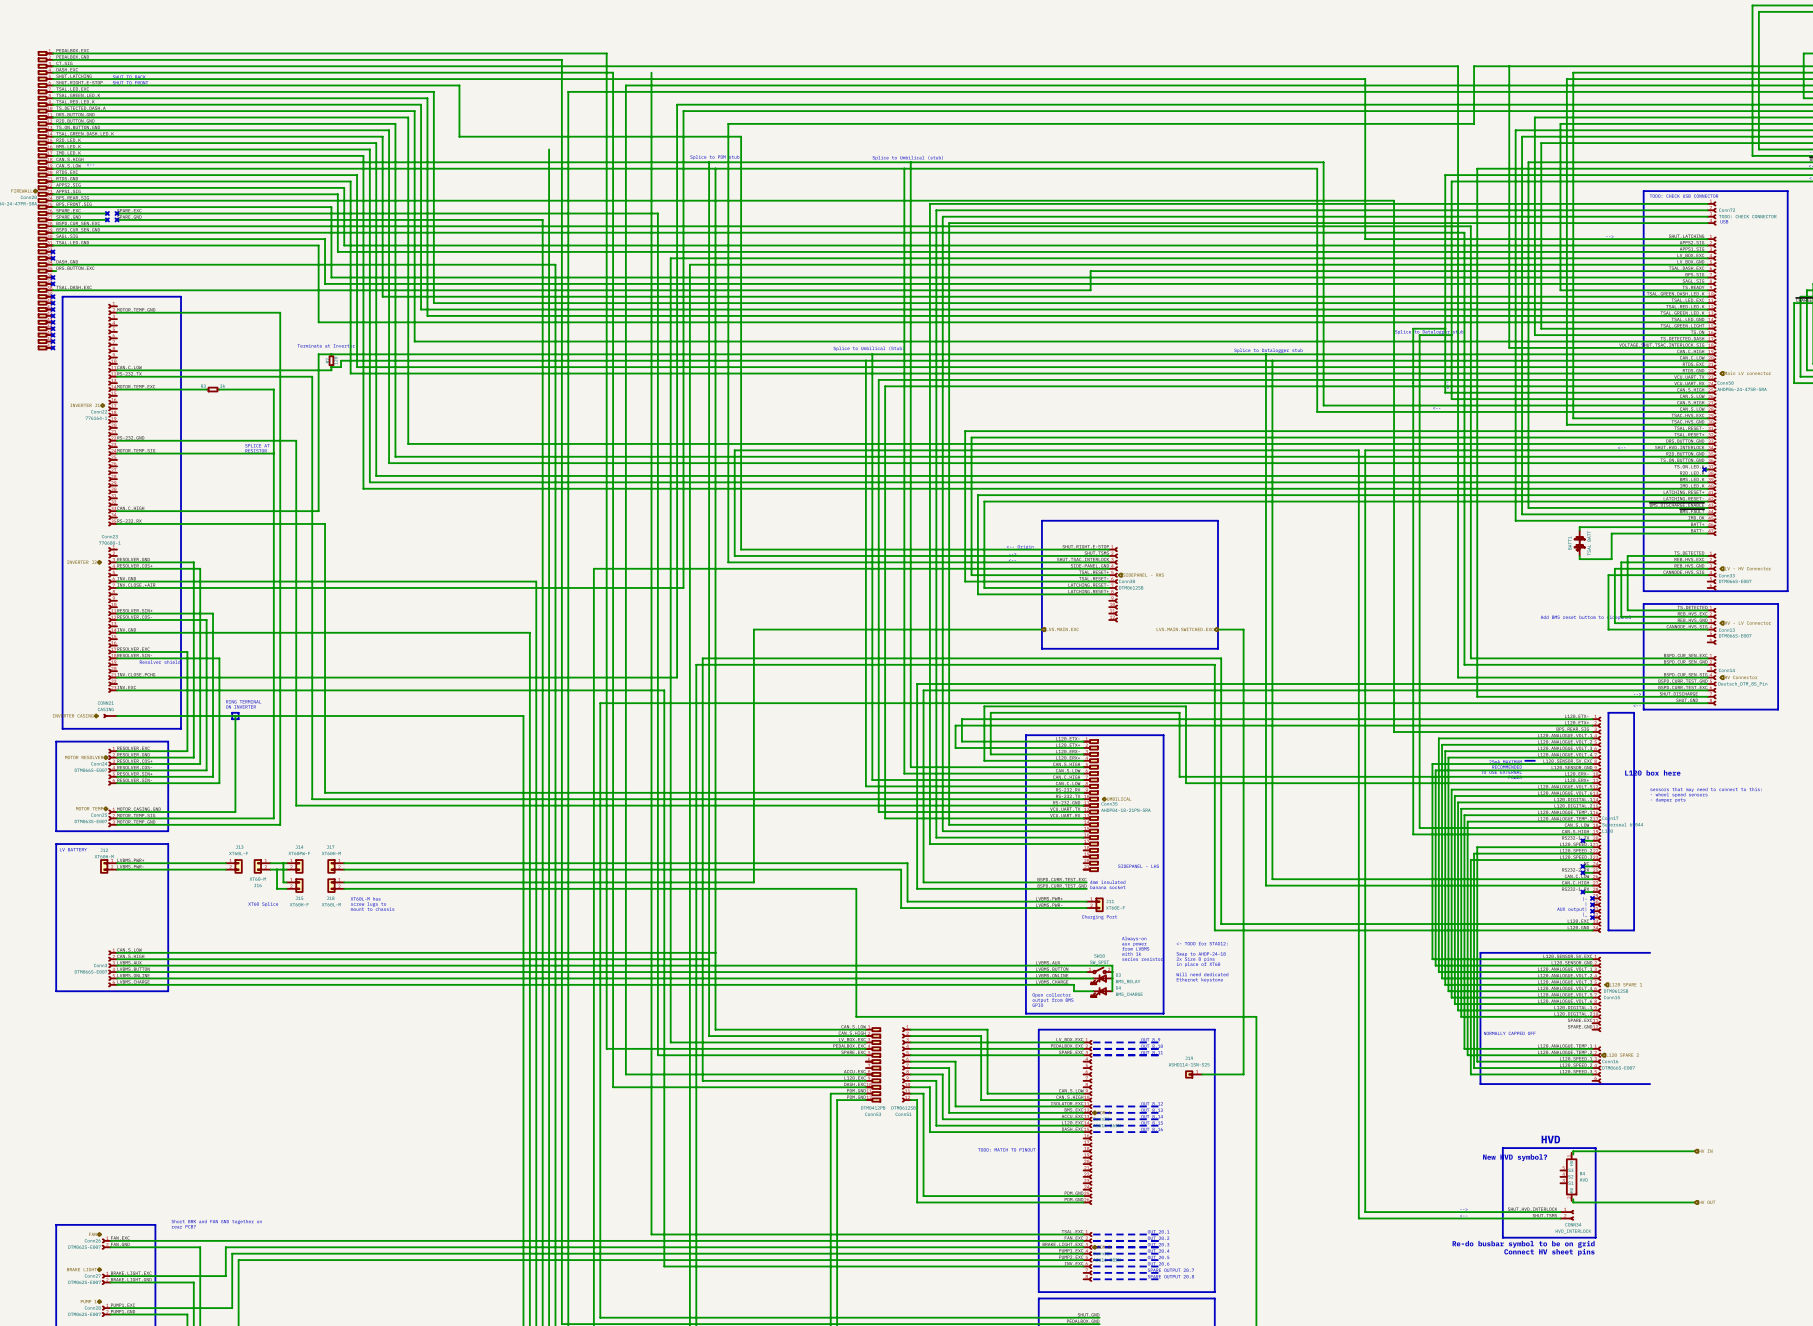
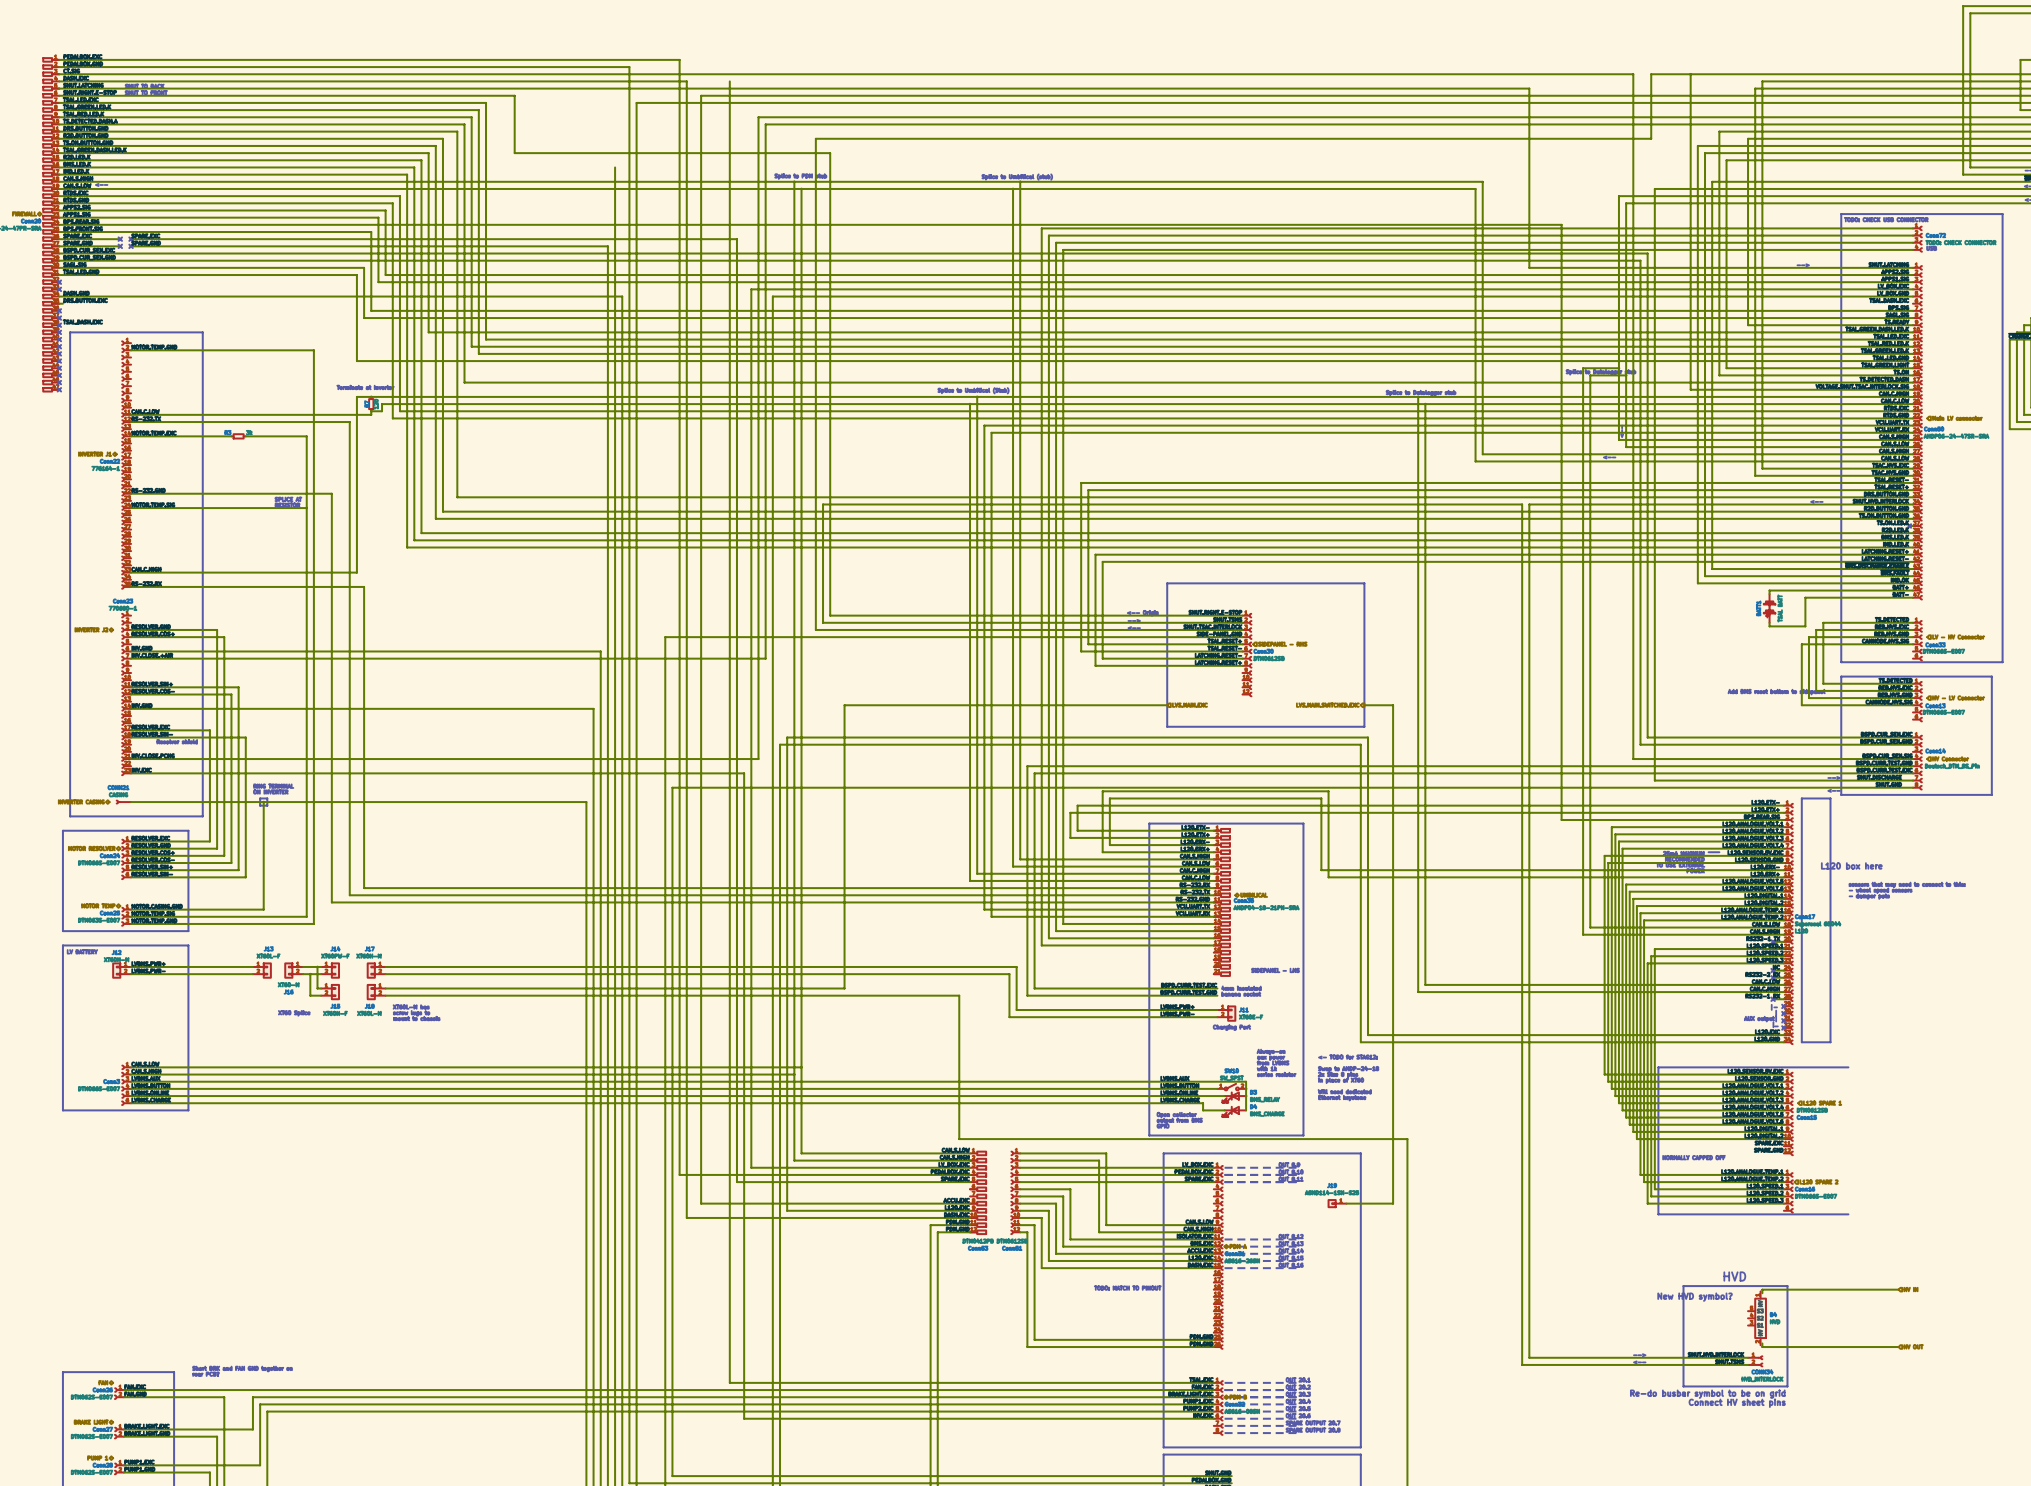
wire: (1707, 271) (1090, 271) (1090, 290) (52, 290) -> none
no-connect mark: none -> (59, 325)

